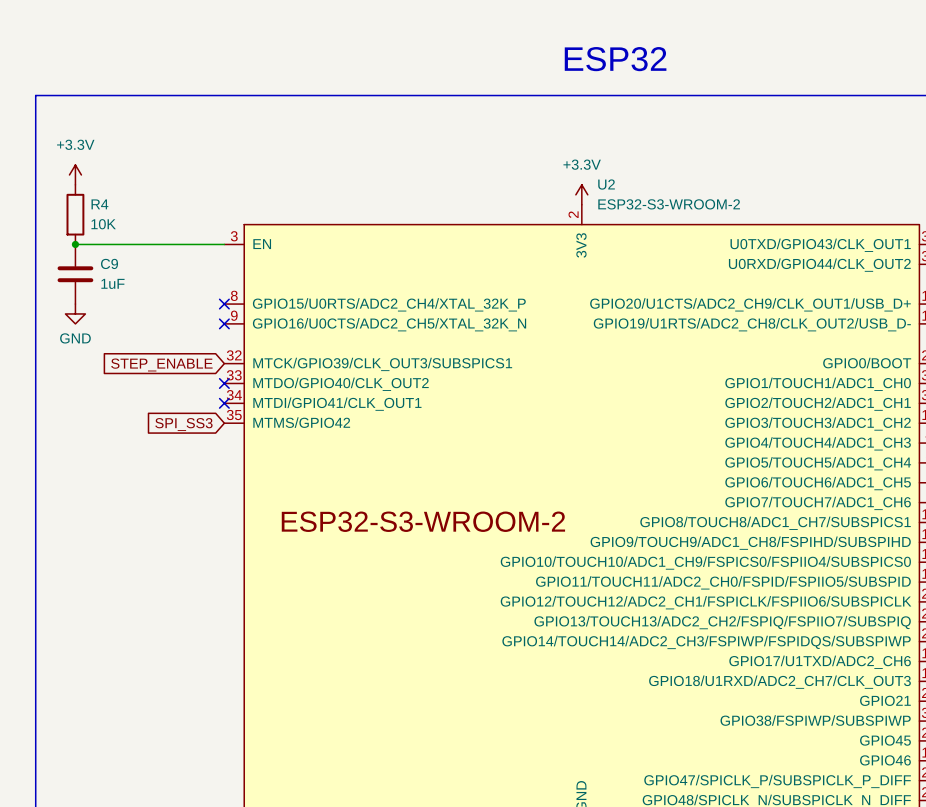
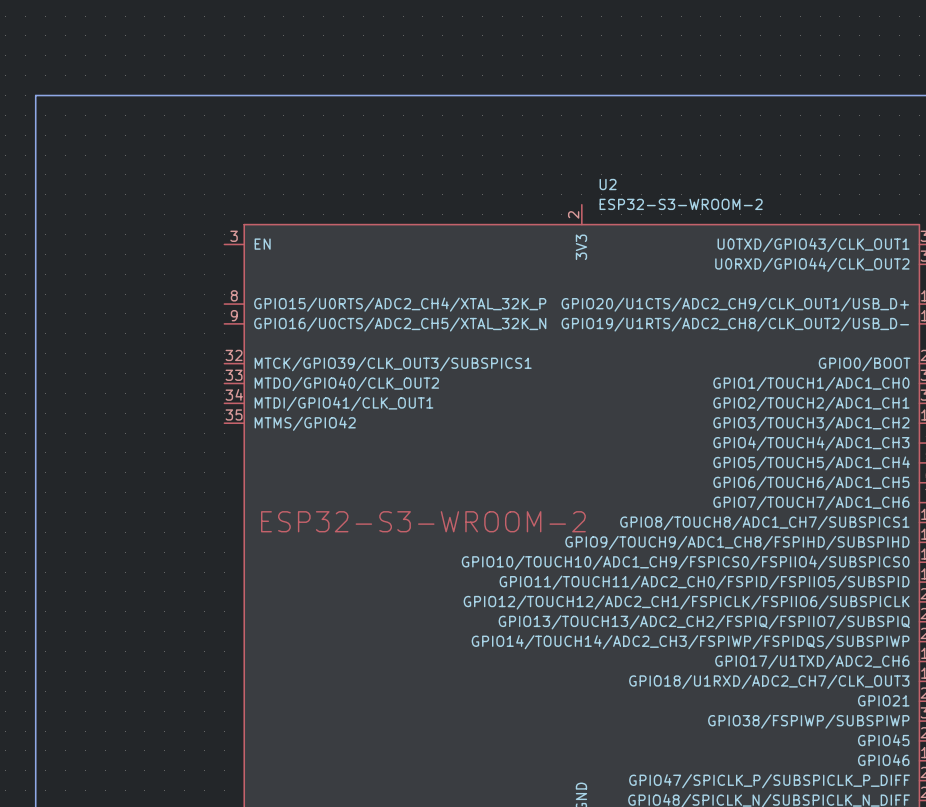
text: ESP32 (615, 59) -> none
power symbol: +3.3V (75, 174) -> none
power symbol: +3.3V (581, 194) -> none
R4: 10K (75, 214) -> none
wire: (75, 244) (224, 244) -> none
junction: (75, 244) -> none
C9: 1uF (75, 274) -> none
no-connect mark: (224, 304) -> none
power symbol: GND (75, 313) -> none
no-connect mark: (224, 323) -> none
global label: STEP_ENABLE (161, 364) -> none
no-connect mark: (224, 383) -> none
no-connect mark: (224, 403) -> none
global label: SPI_SS3 (183, 424) -> none

